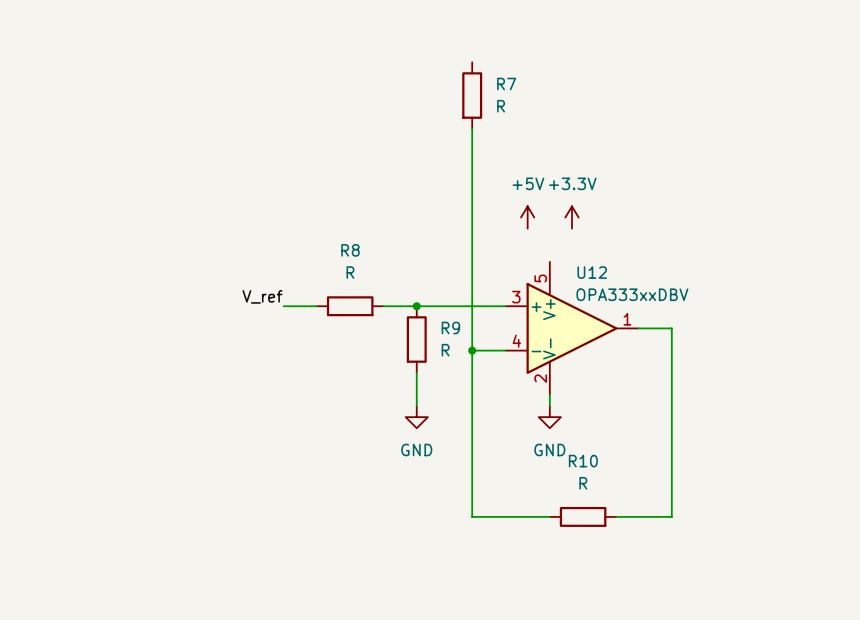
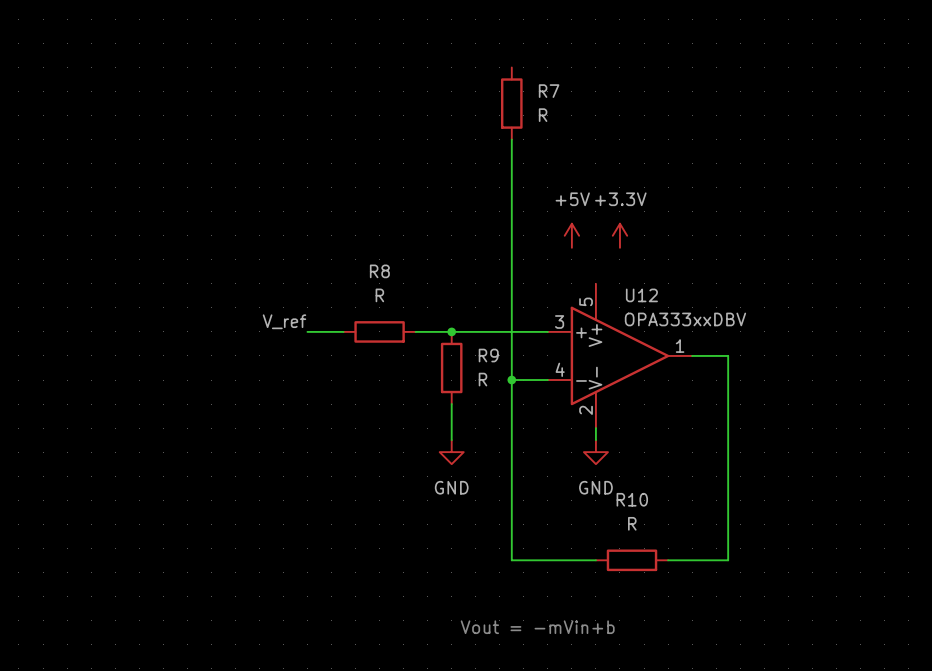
text: none -> Vout = -mVin+b (537, 627)

